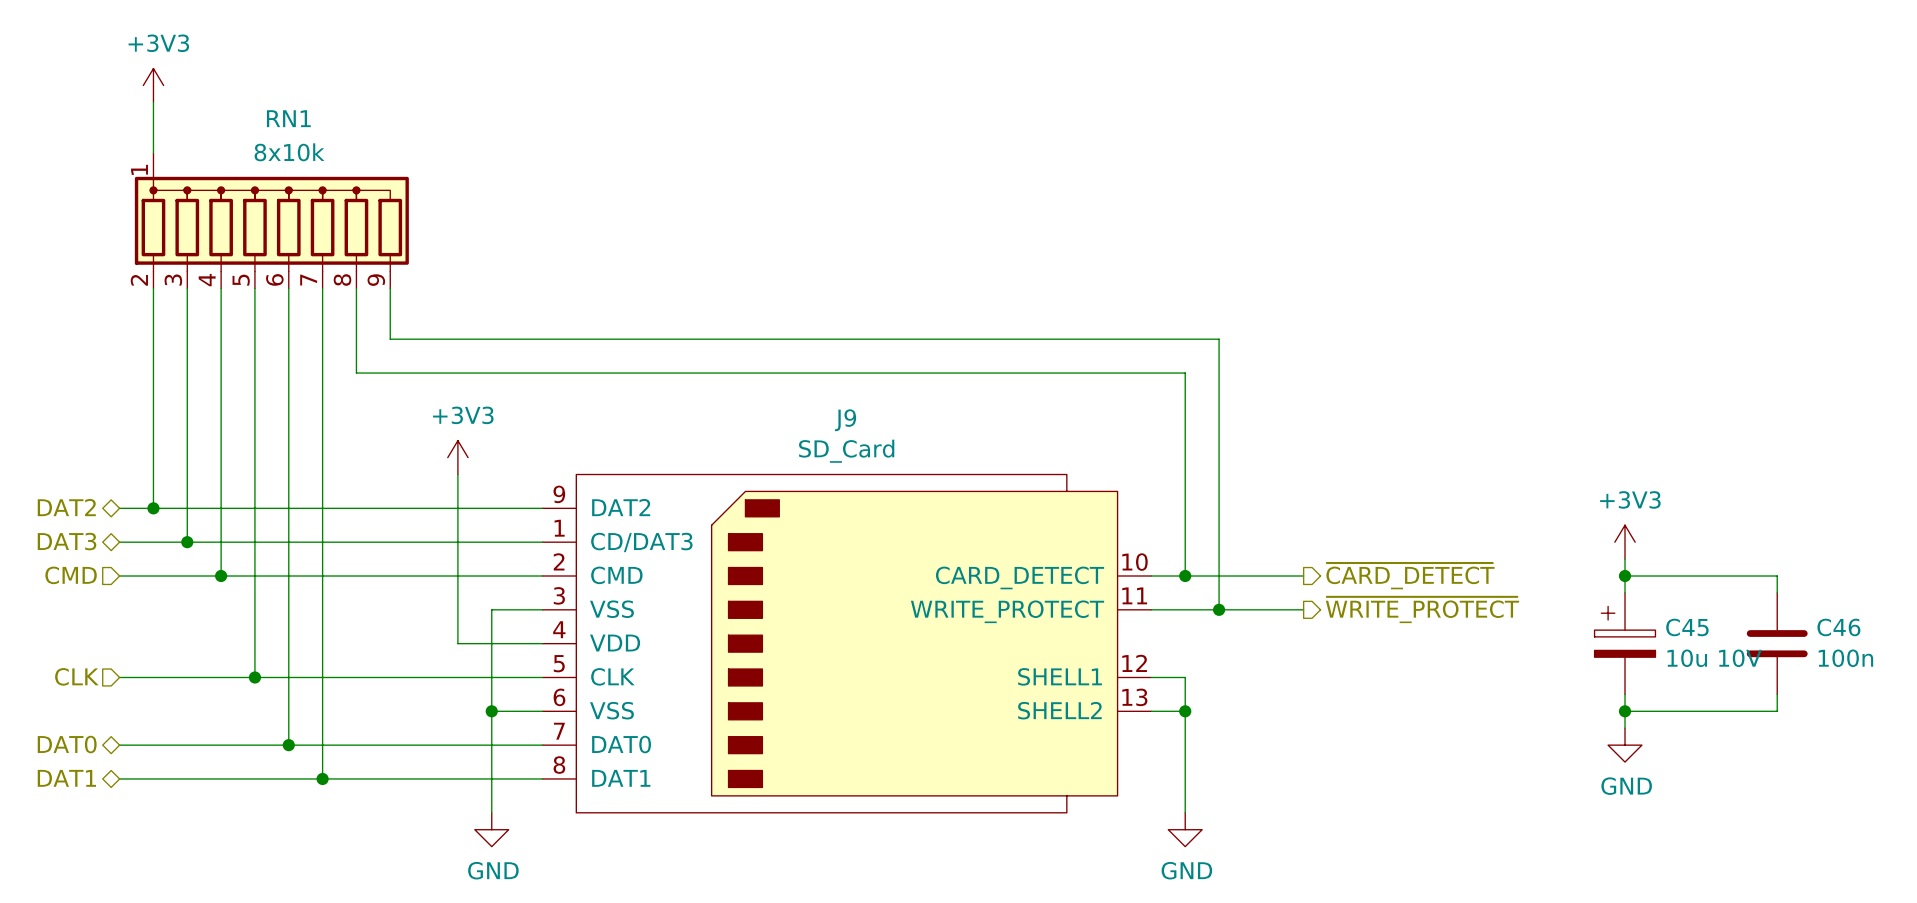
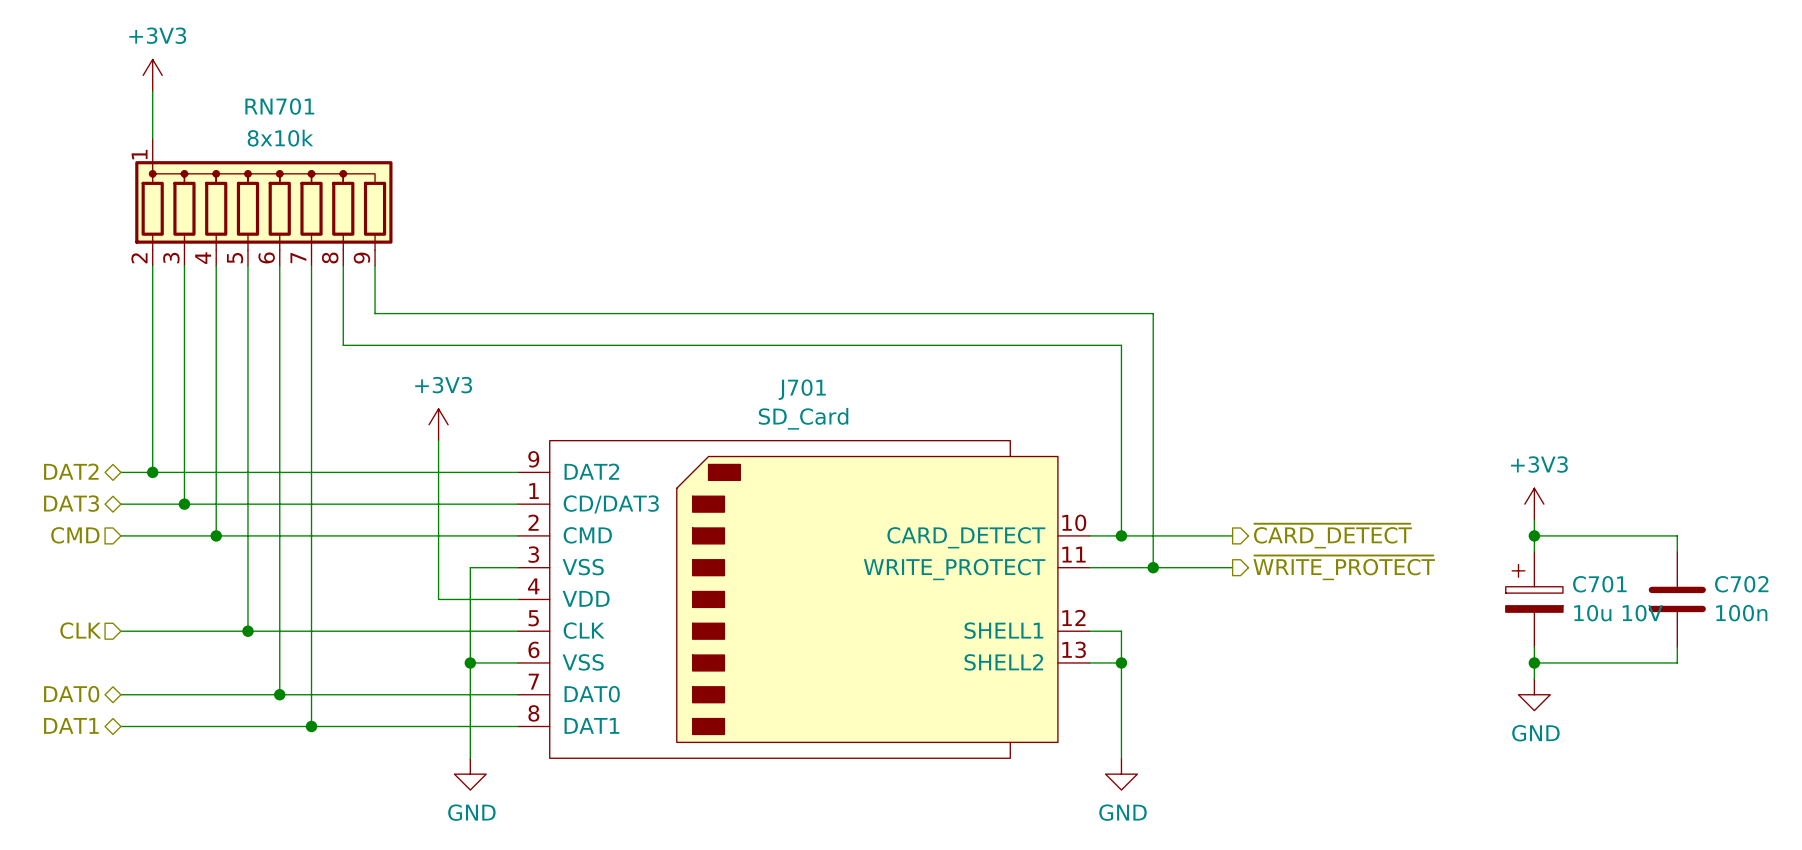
RN1 name: RN1 (288, 118) -> RN701 (279, 106)
J9 name: J9 (845, 420) -> J701 (802, 389)
C45 name: C45 (1687, 627) -> C701 (1599, 584)
C46 name: C46 (1838, 627) -> C702 (1741, 584)

